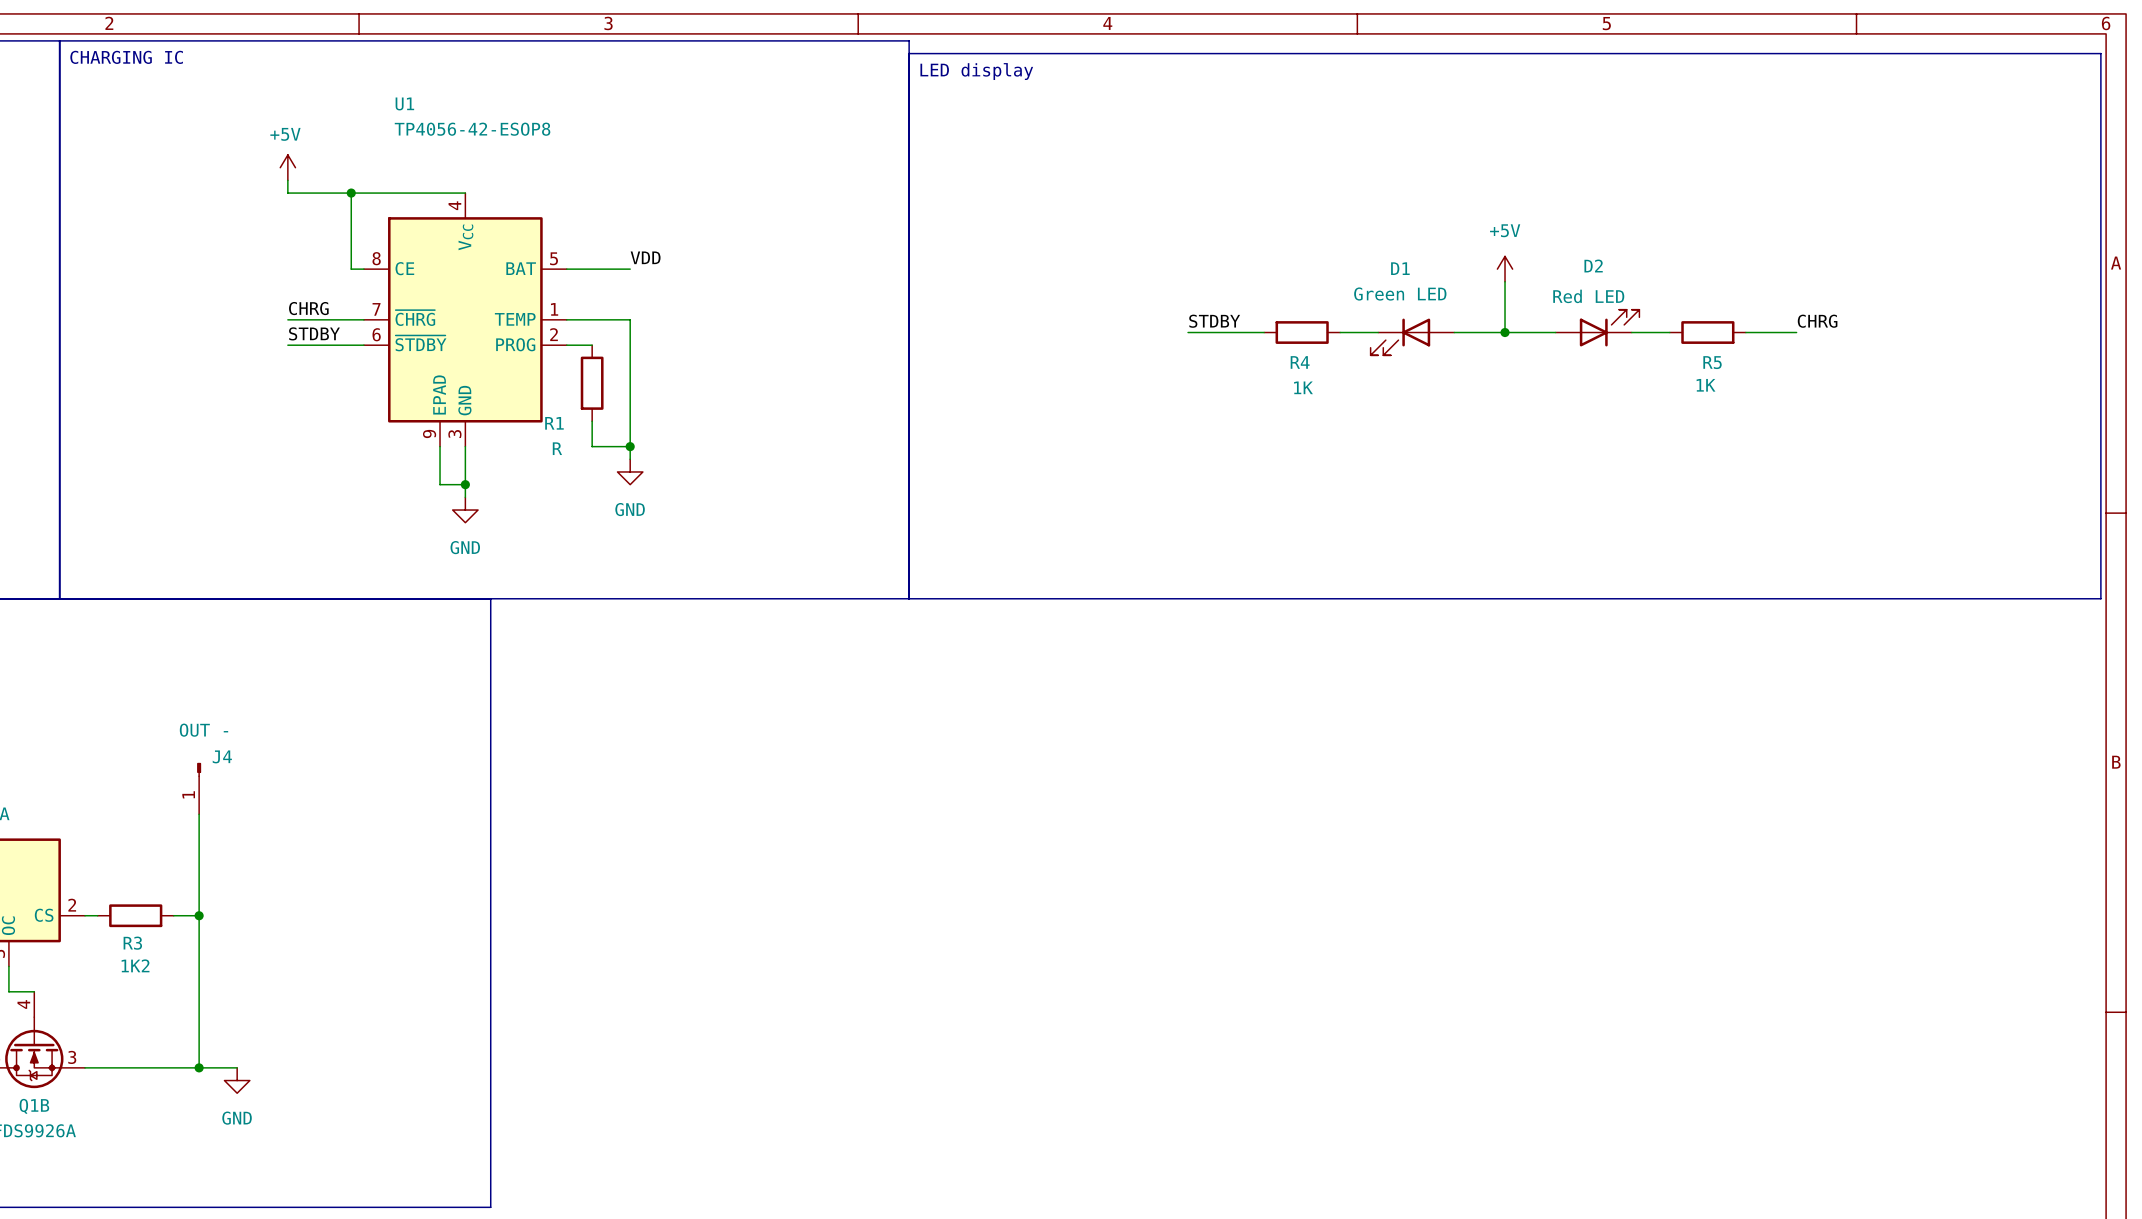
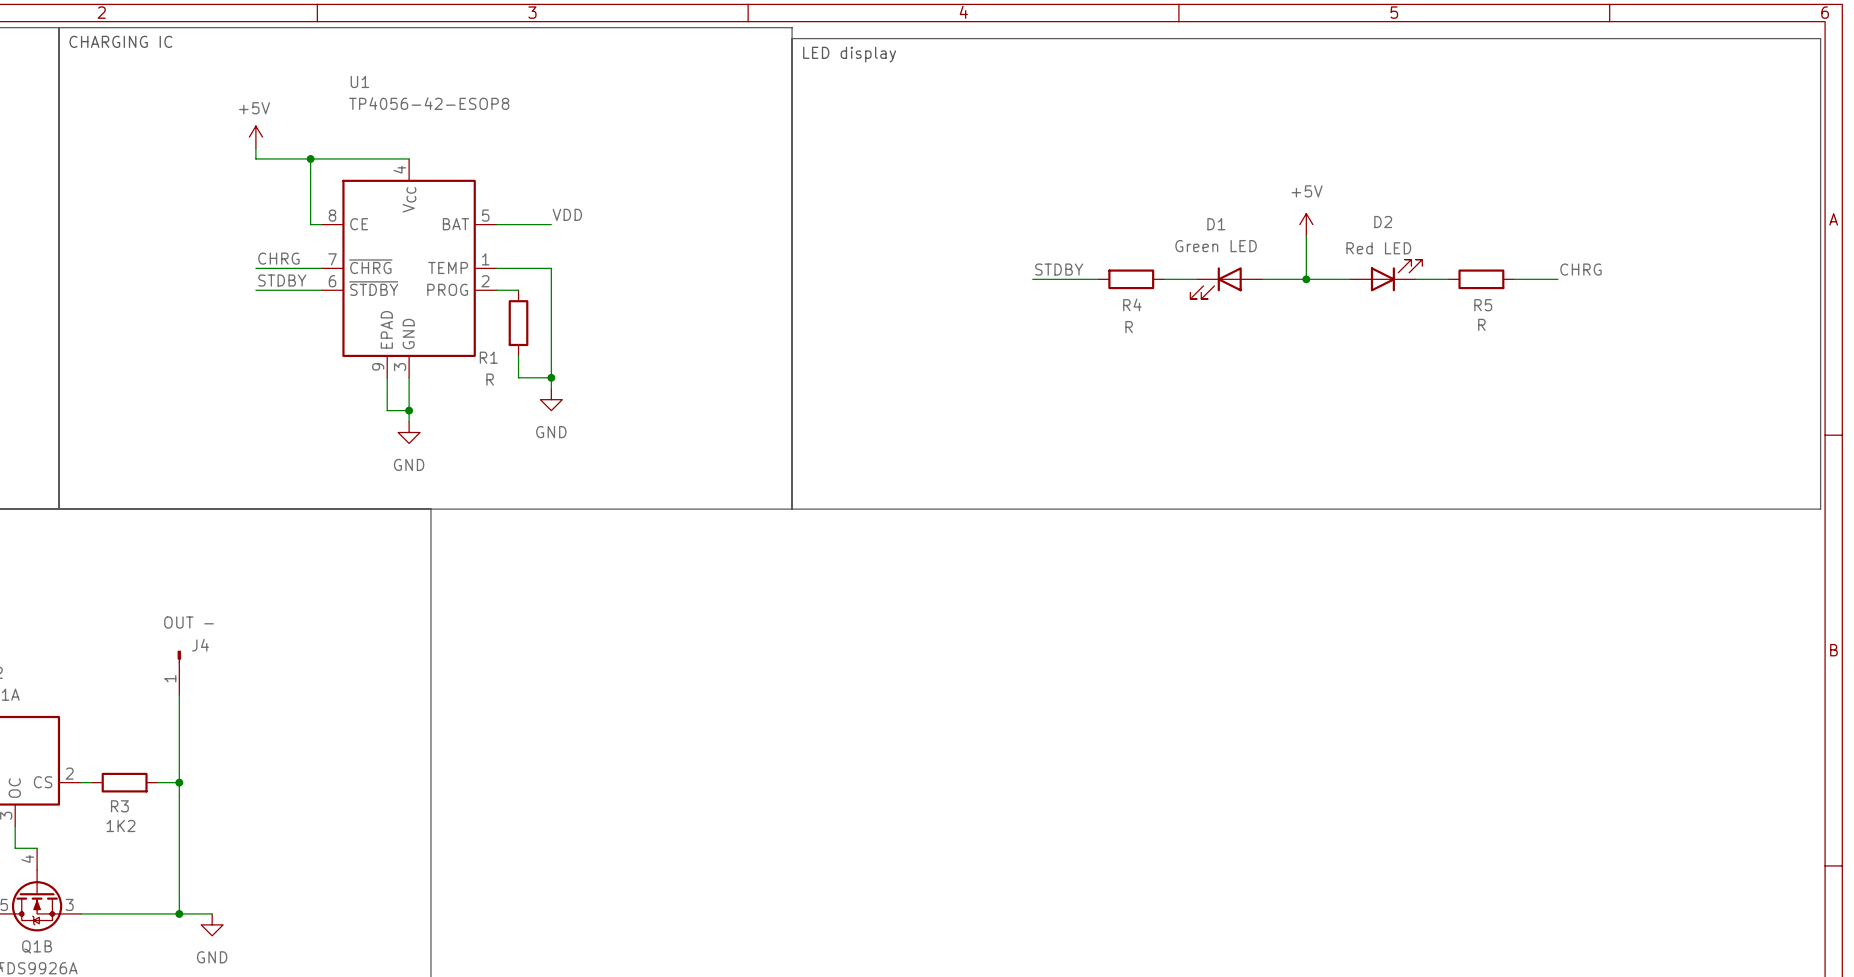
R5 value: 1K (1706, 385) -> R (1481, 324)
R4 value: 1K (1303, 387) -> R (1129, 327)

